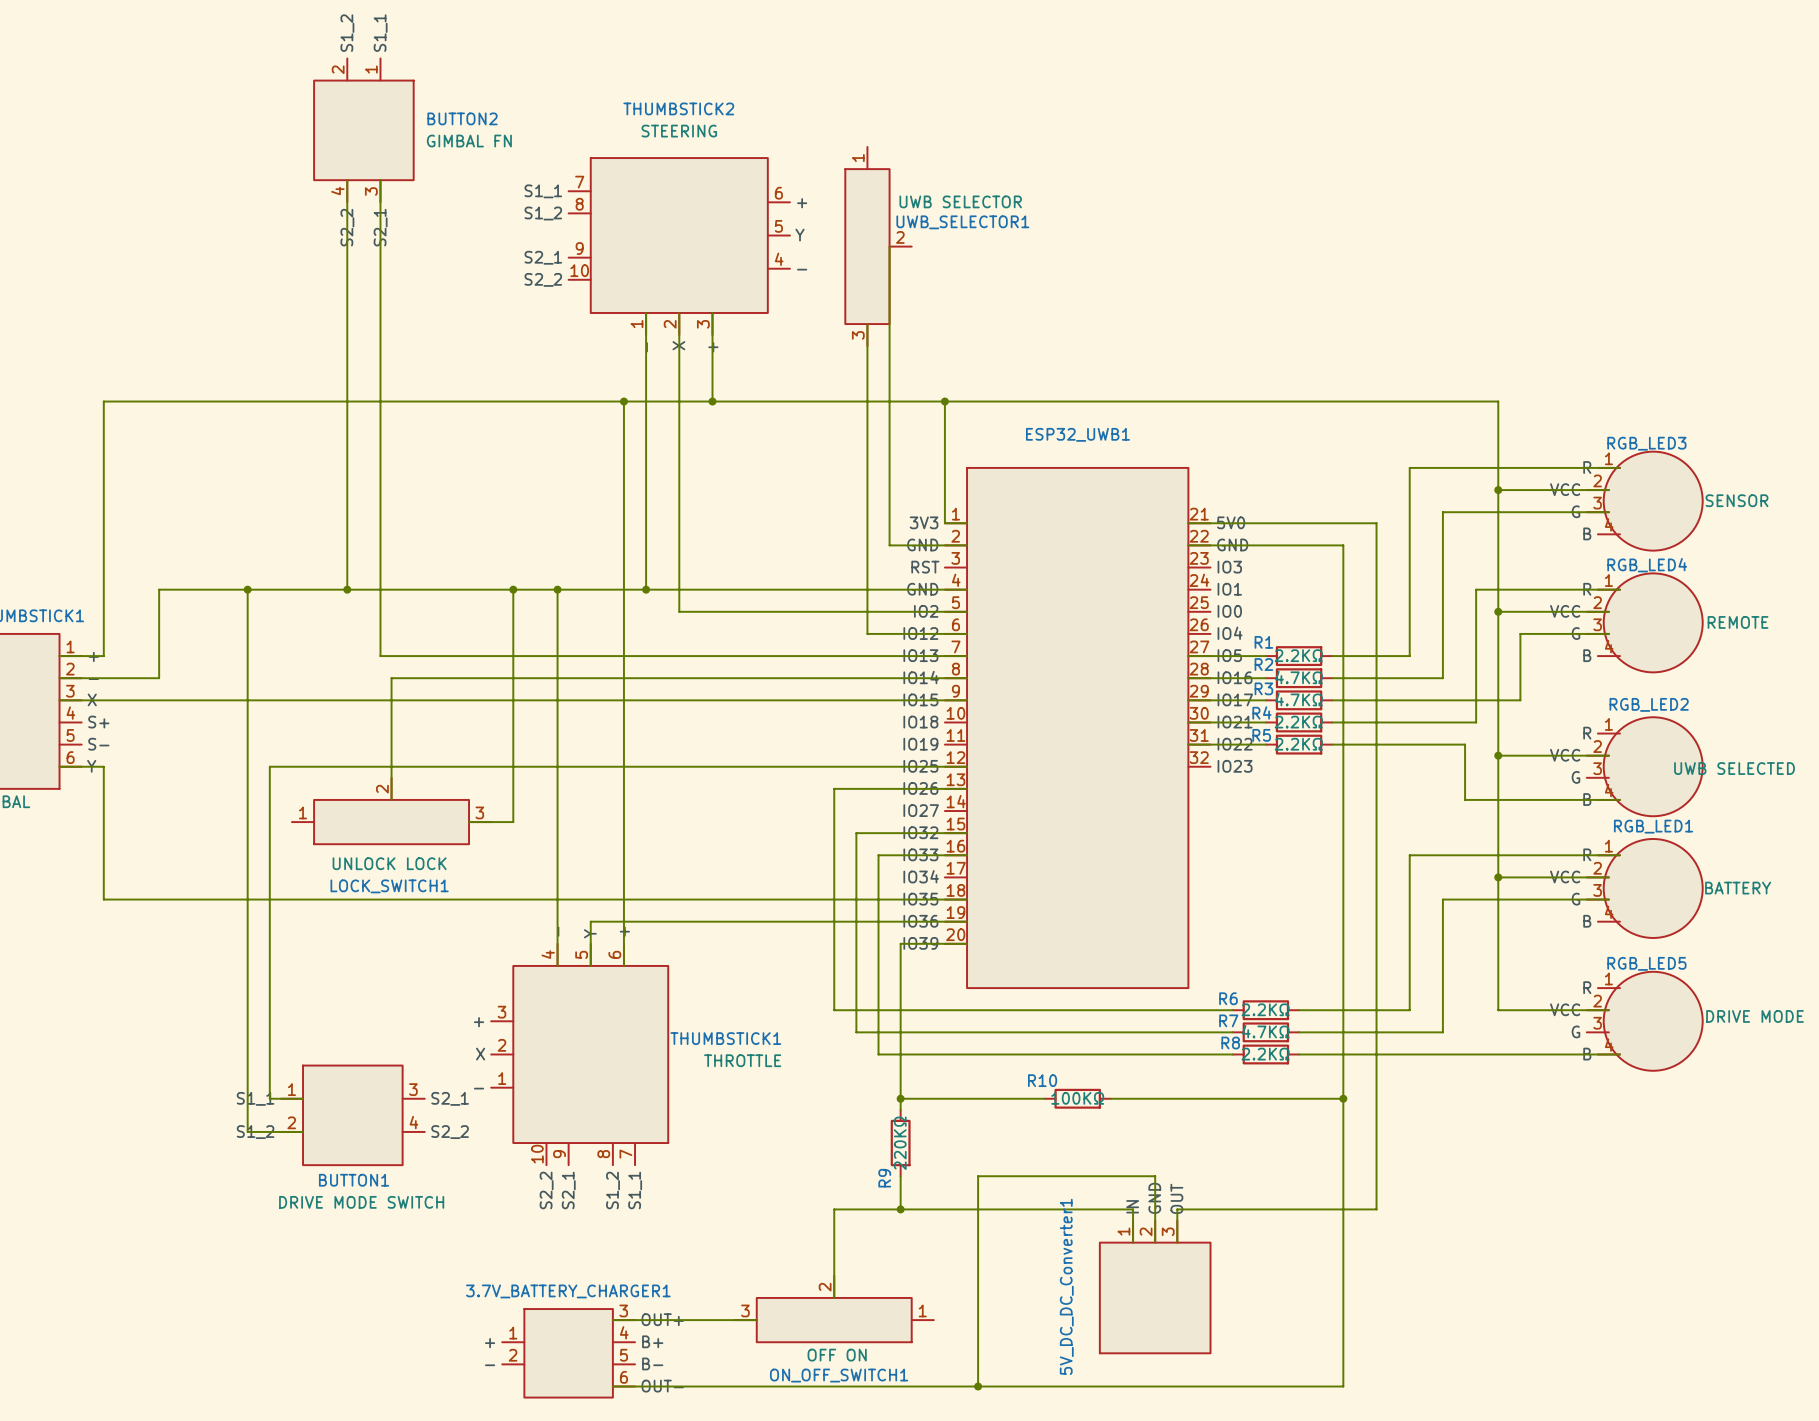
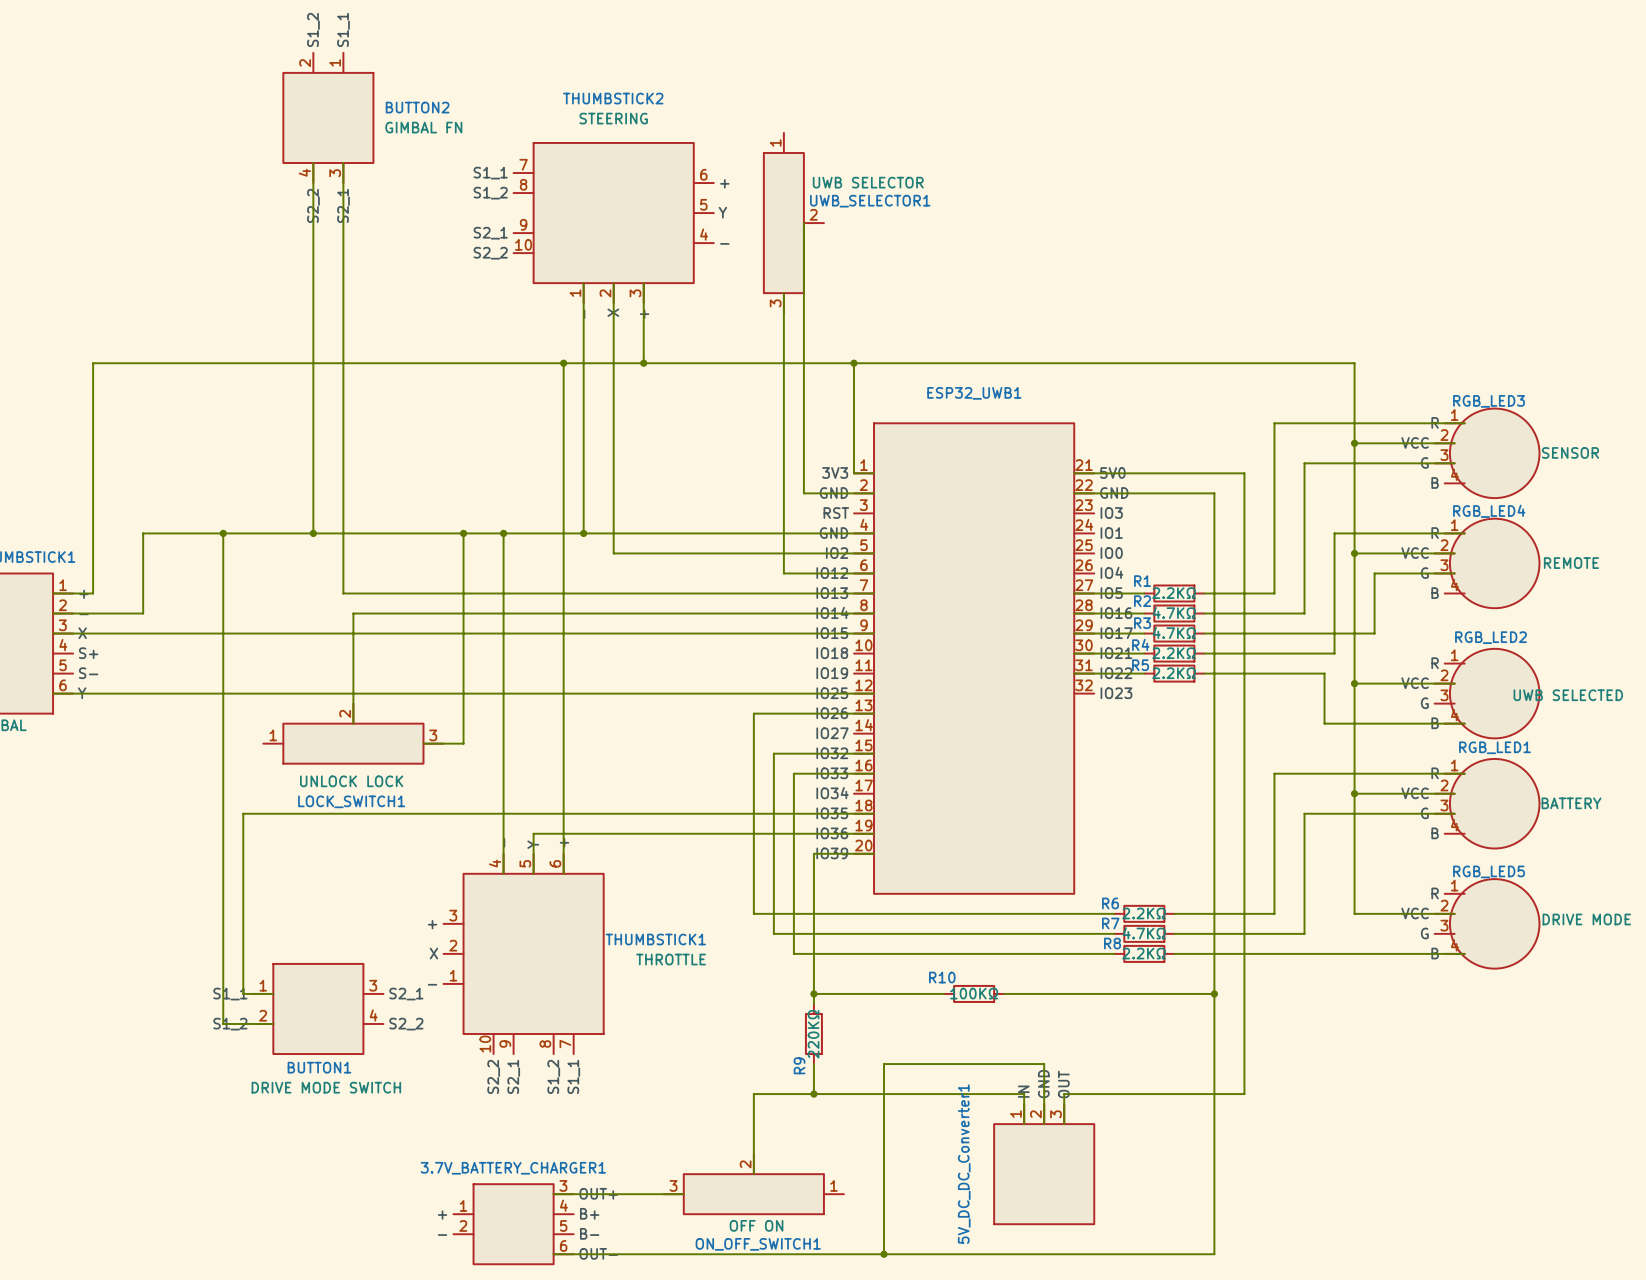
wire: (103, 766) (103, 899) (269, 899) (269, 766) -> (93, 693) (243, 693)

